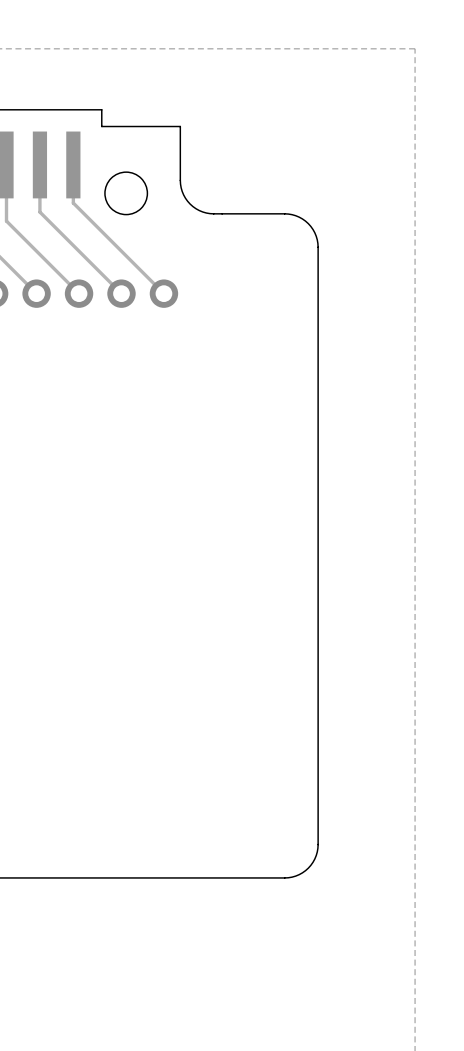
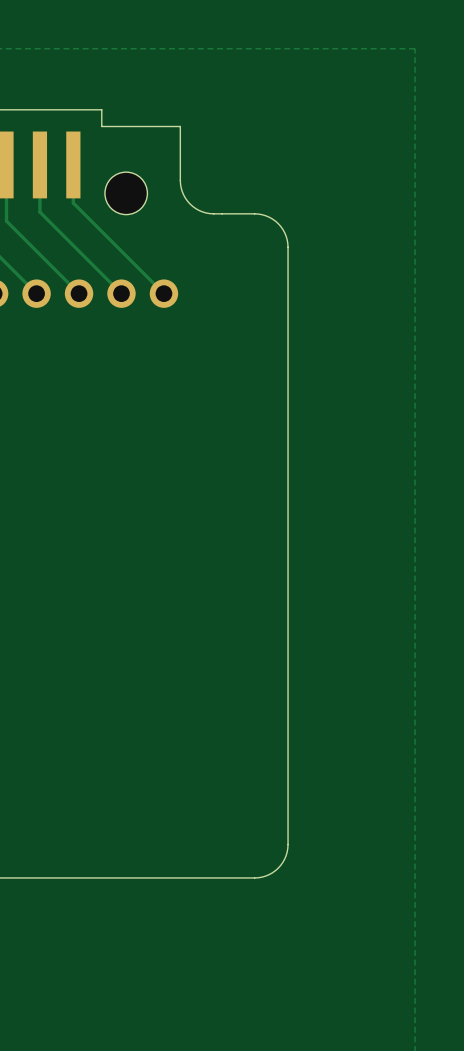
board edge: (254, 213) (288, 214) (299, 217) (312, 229) (318, 247) (317, 848) (310, 865) (299, 874) (288, 877) (254, 877) -> (254, 213) (265, 215) (278, 223) (284, 232) (288, 247) (288, 844) (284, 859) (278, 868) (265, 876) (254, 877)

